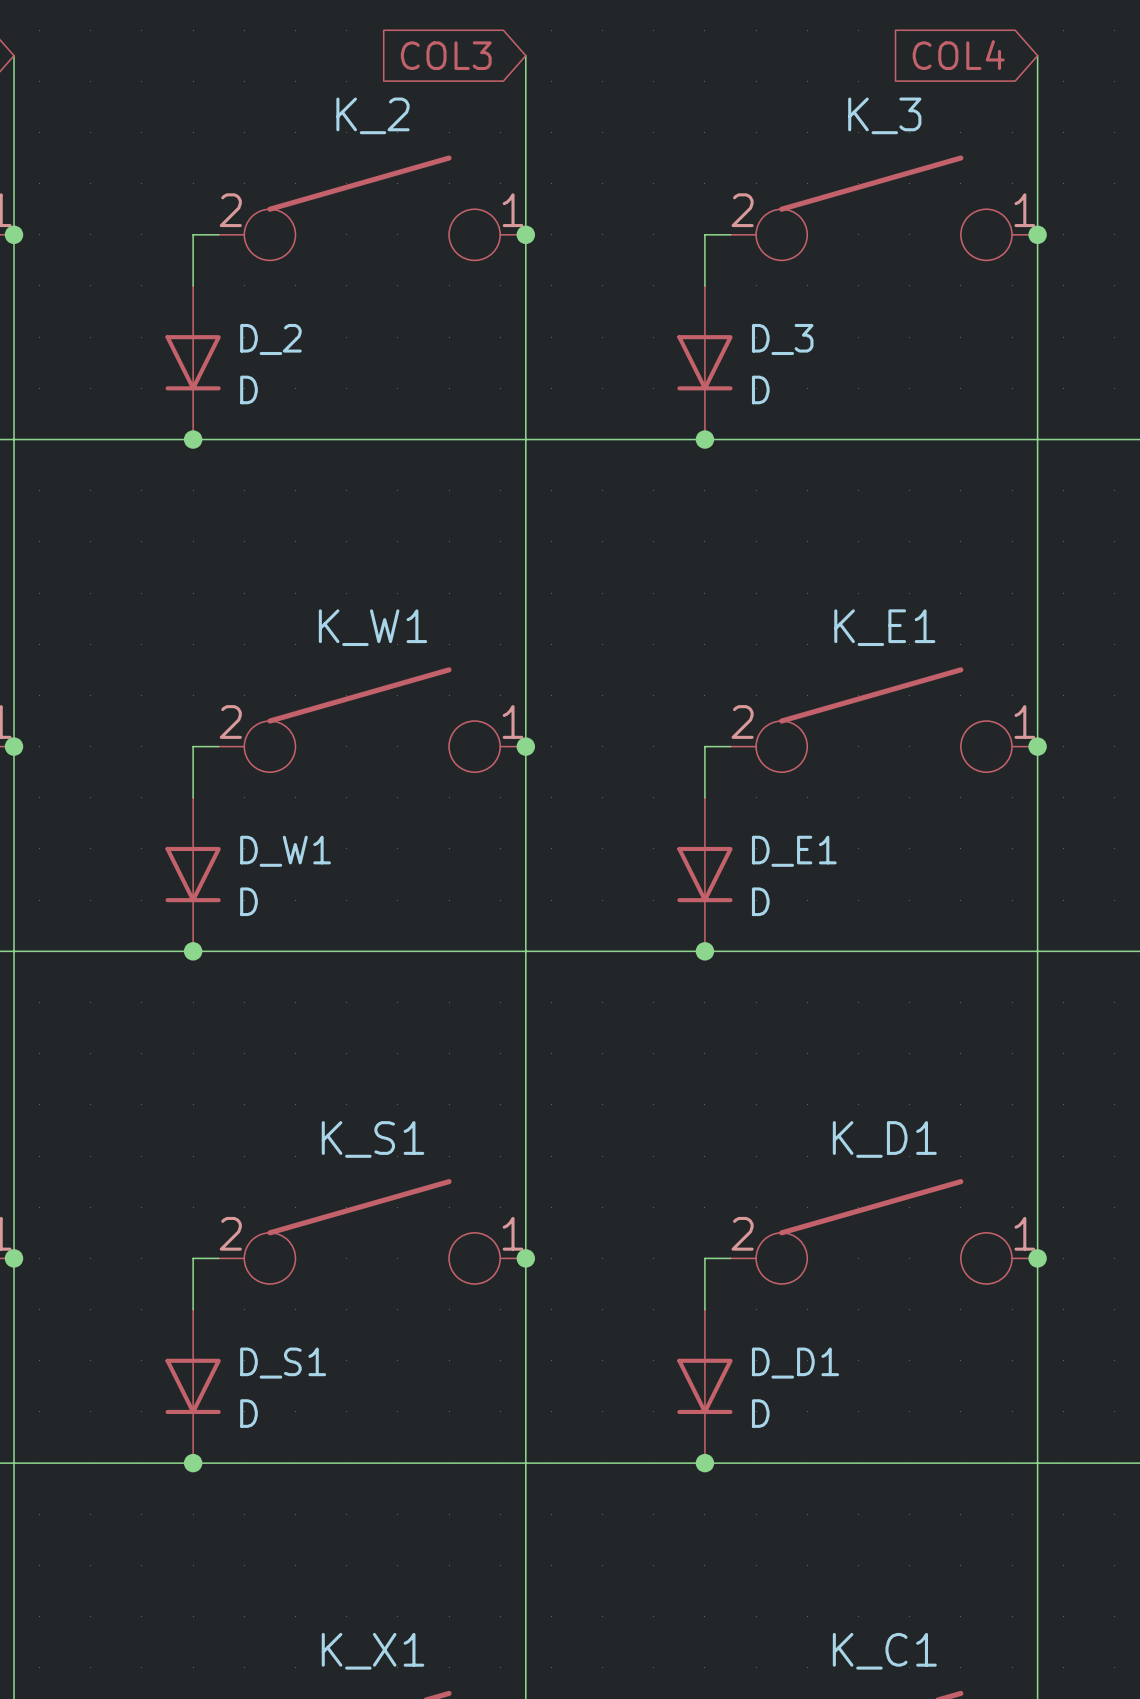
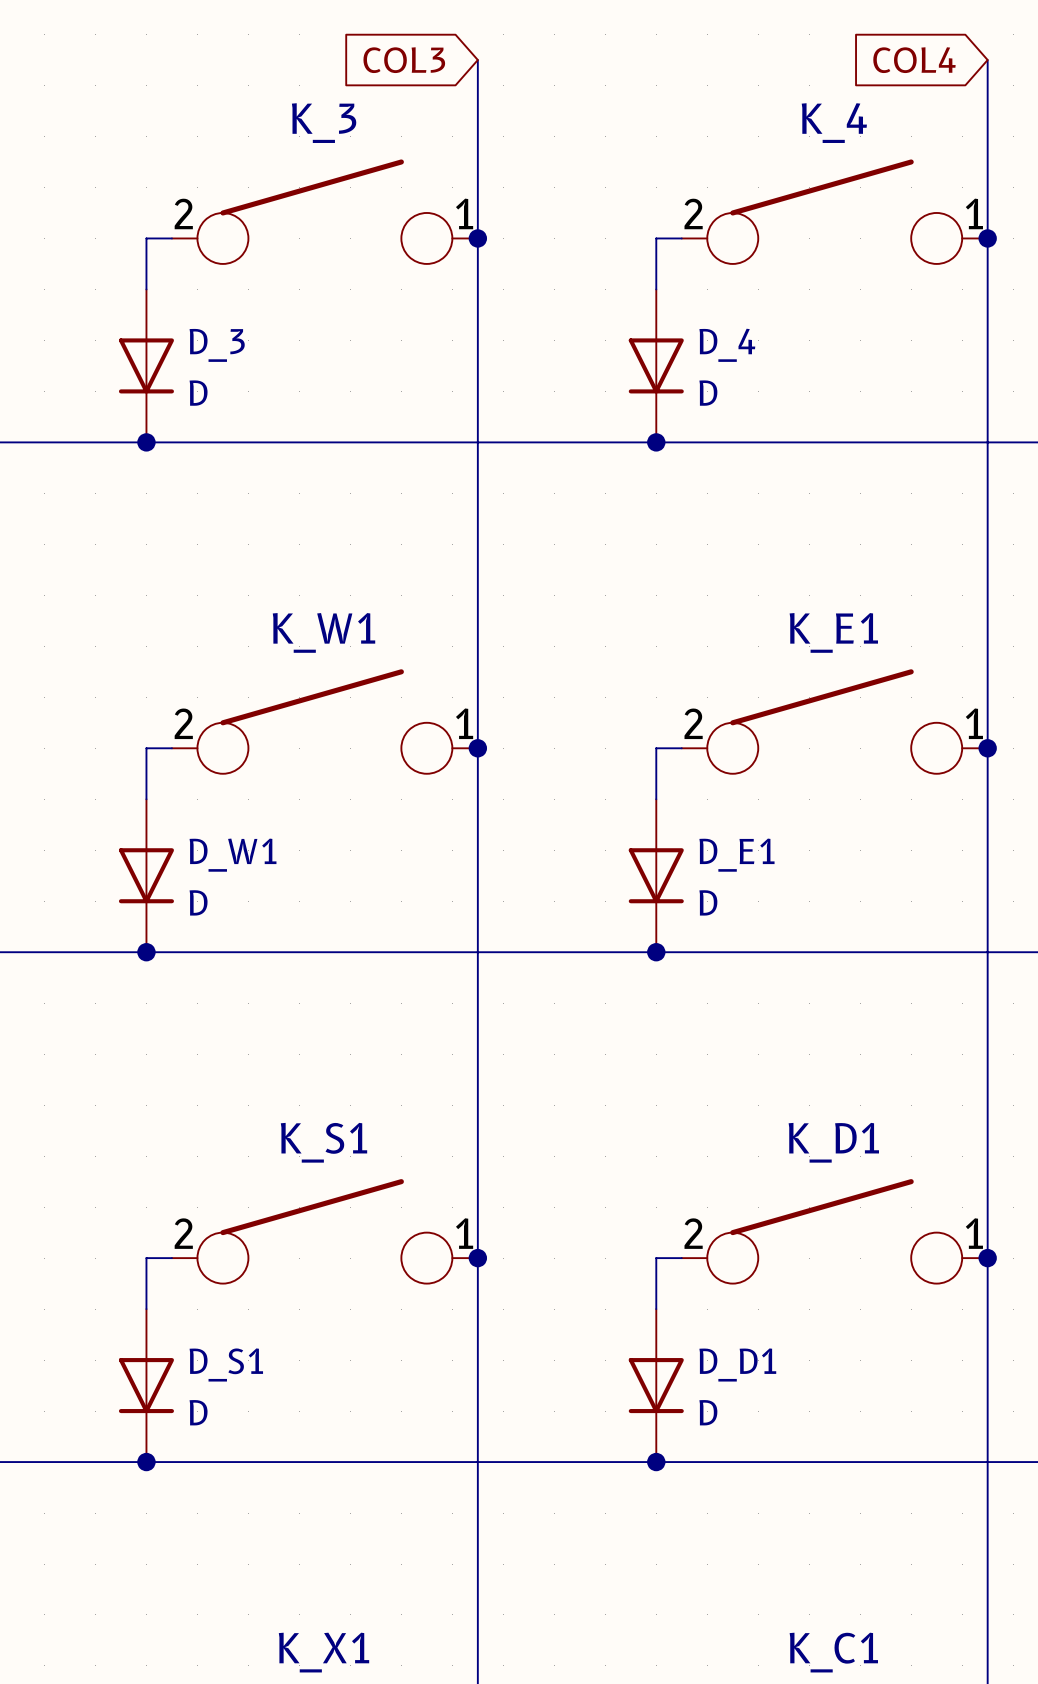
K_2 name: K_2 (372, 115) -> K_3 (324, 123)
K_3 name: K_3 (884, 115) -> K_4 (834, 123)
D_2 name: D_2 (270, 339) -> D_3 (217, 345)
D_3 name: D_3 (782, 339) -> D_4 (727, 345)

